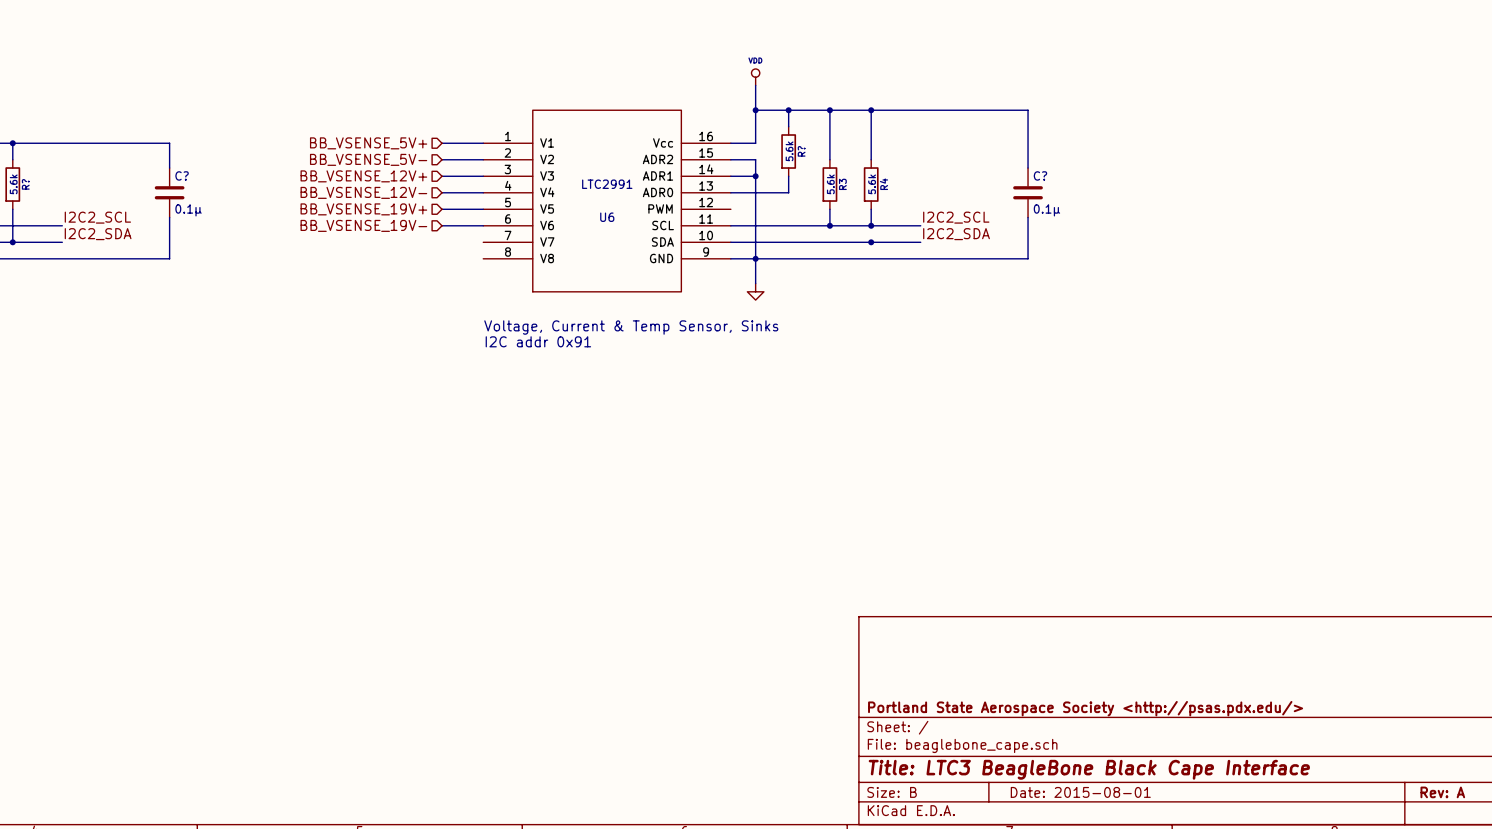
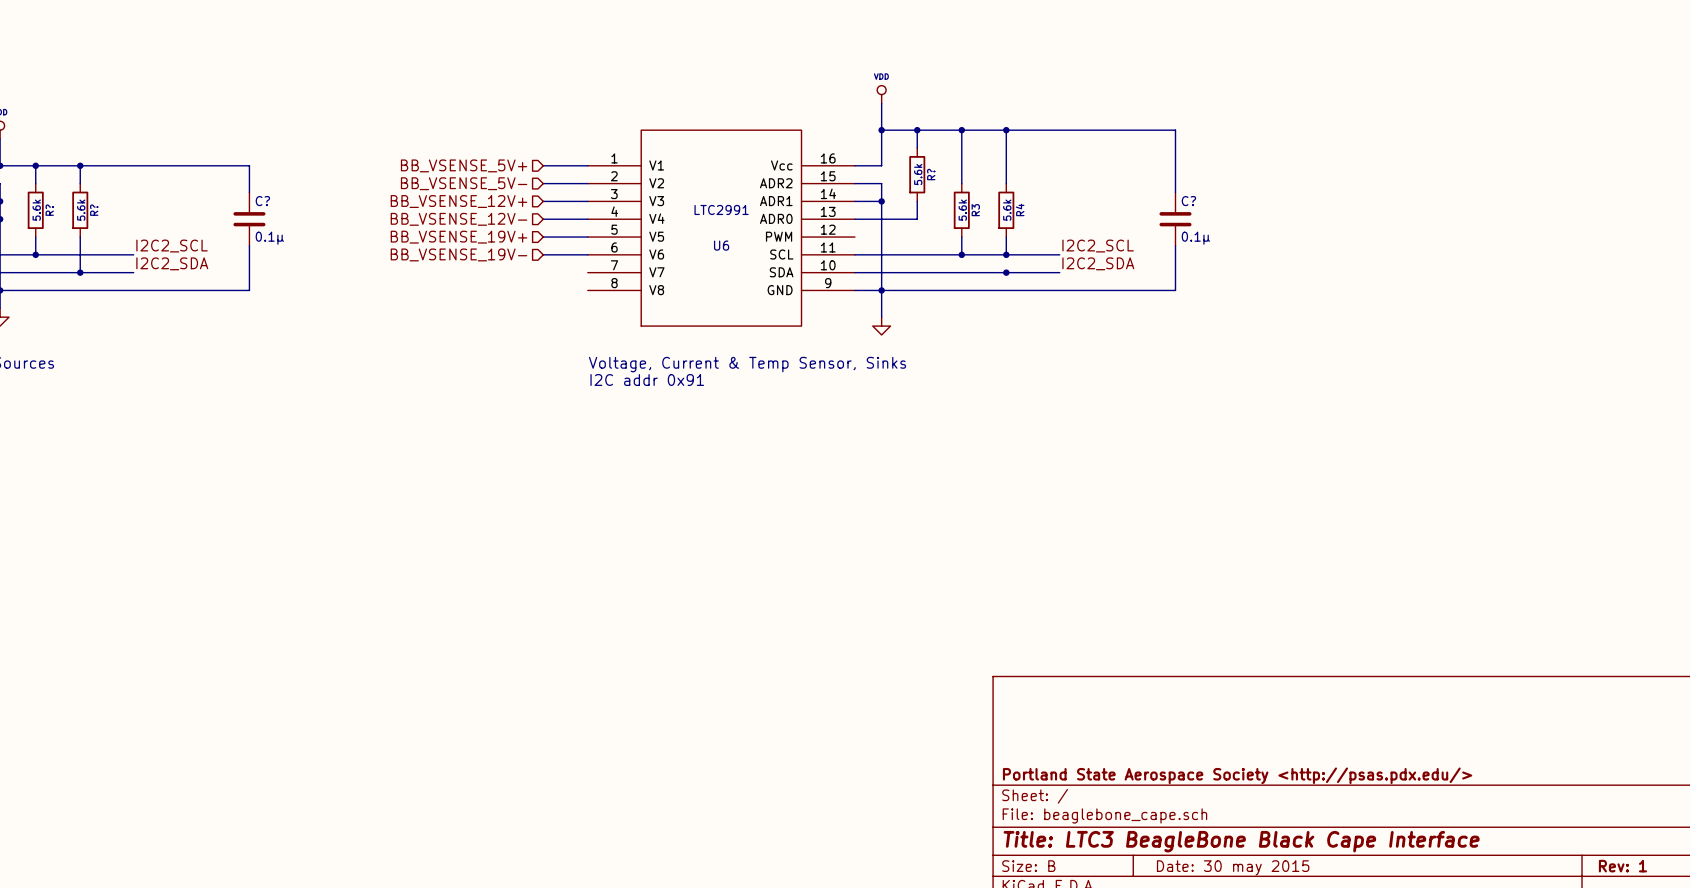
title block: Date: 2015-08-01 (1080, 792) -> Date: 30 may 2015 (1233, 867)
title block: Rev: A (1442, 792) -> Rev: 1 (1622, 866)

